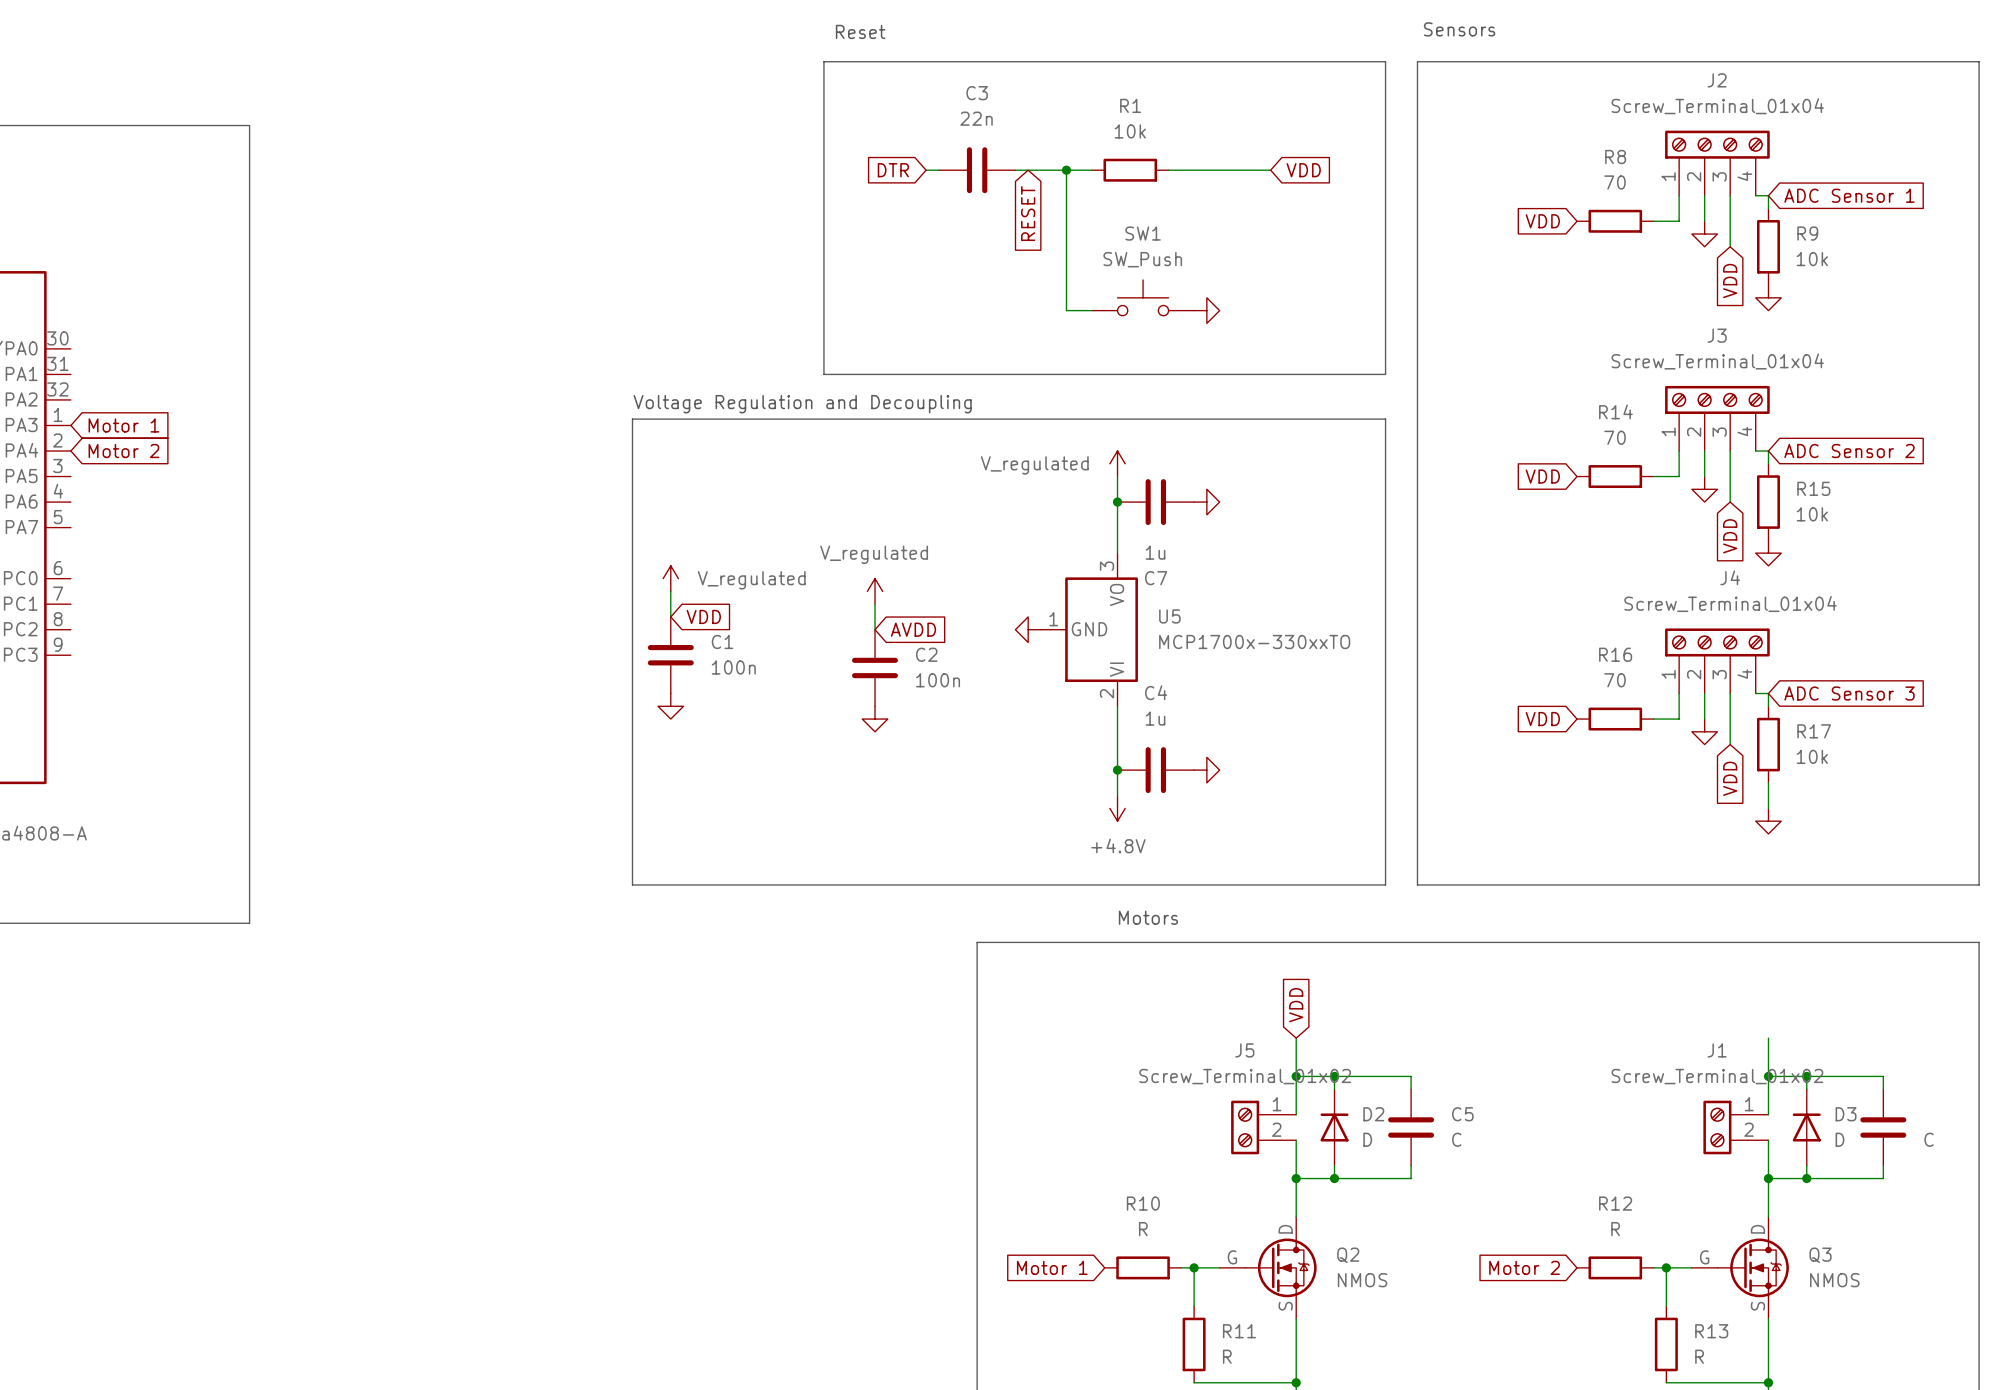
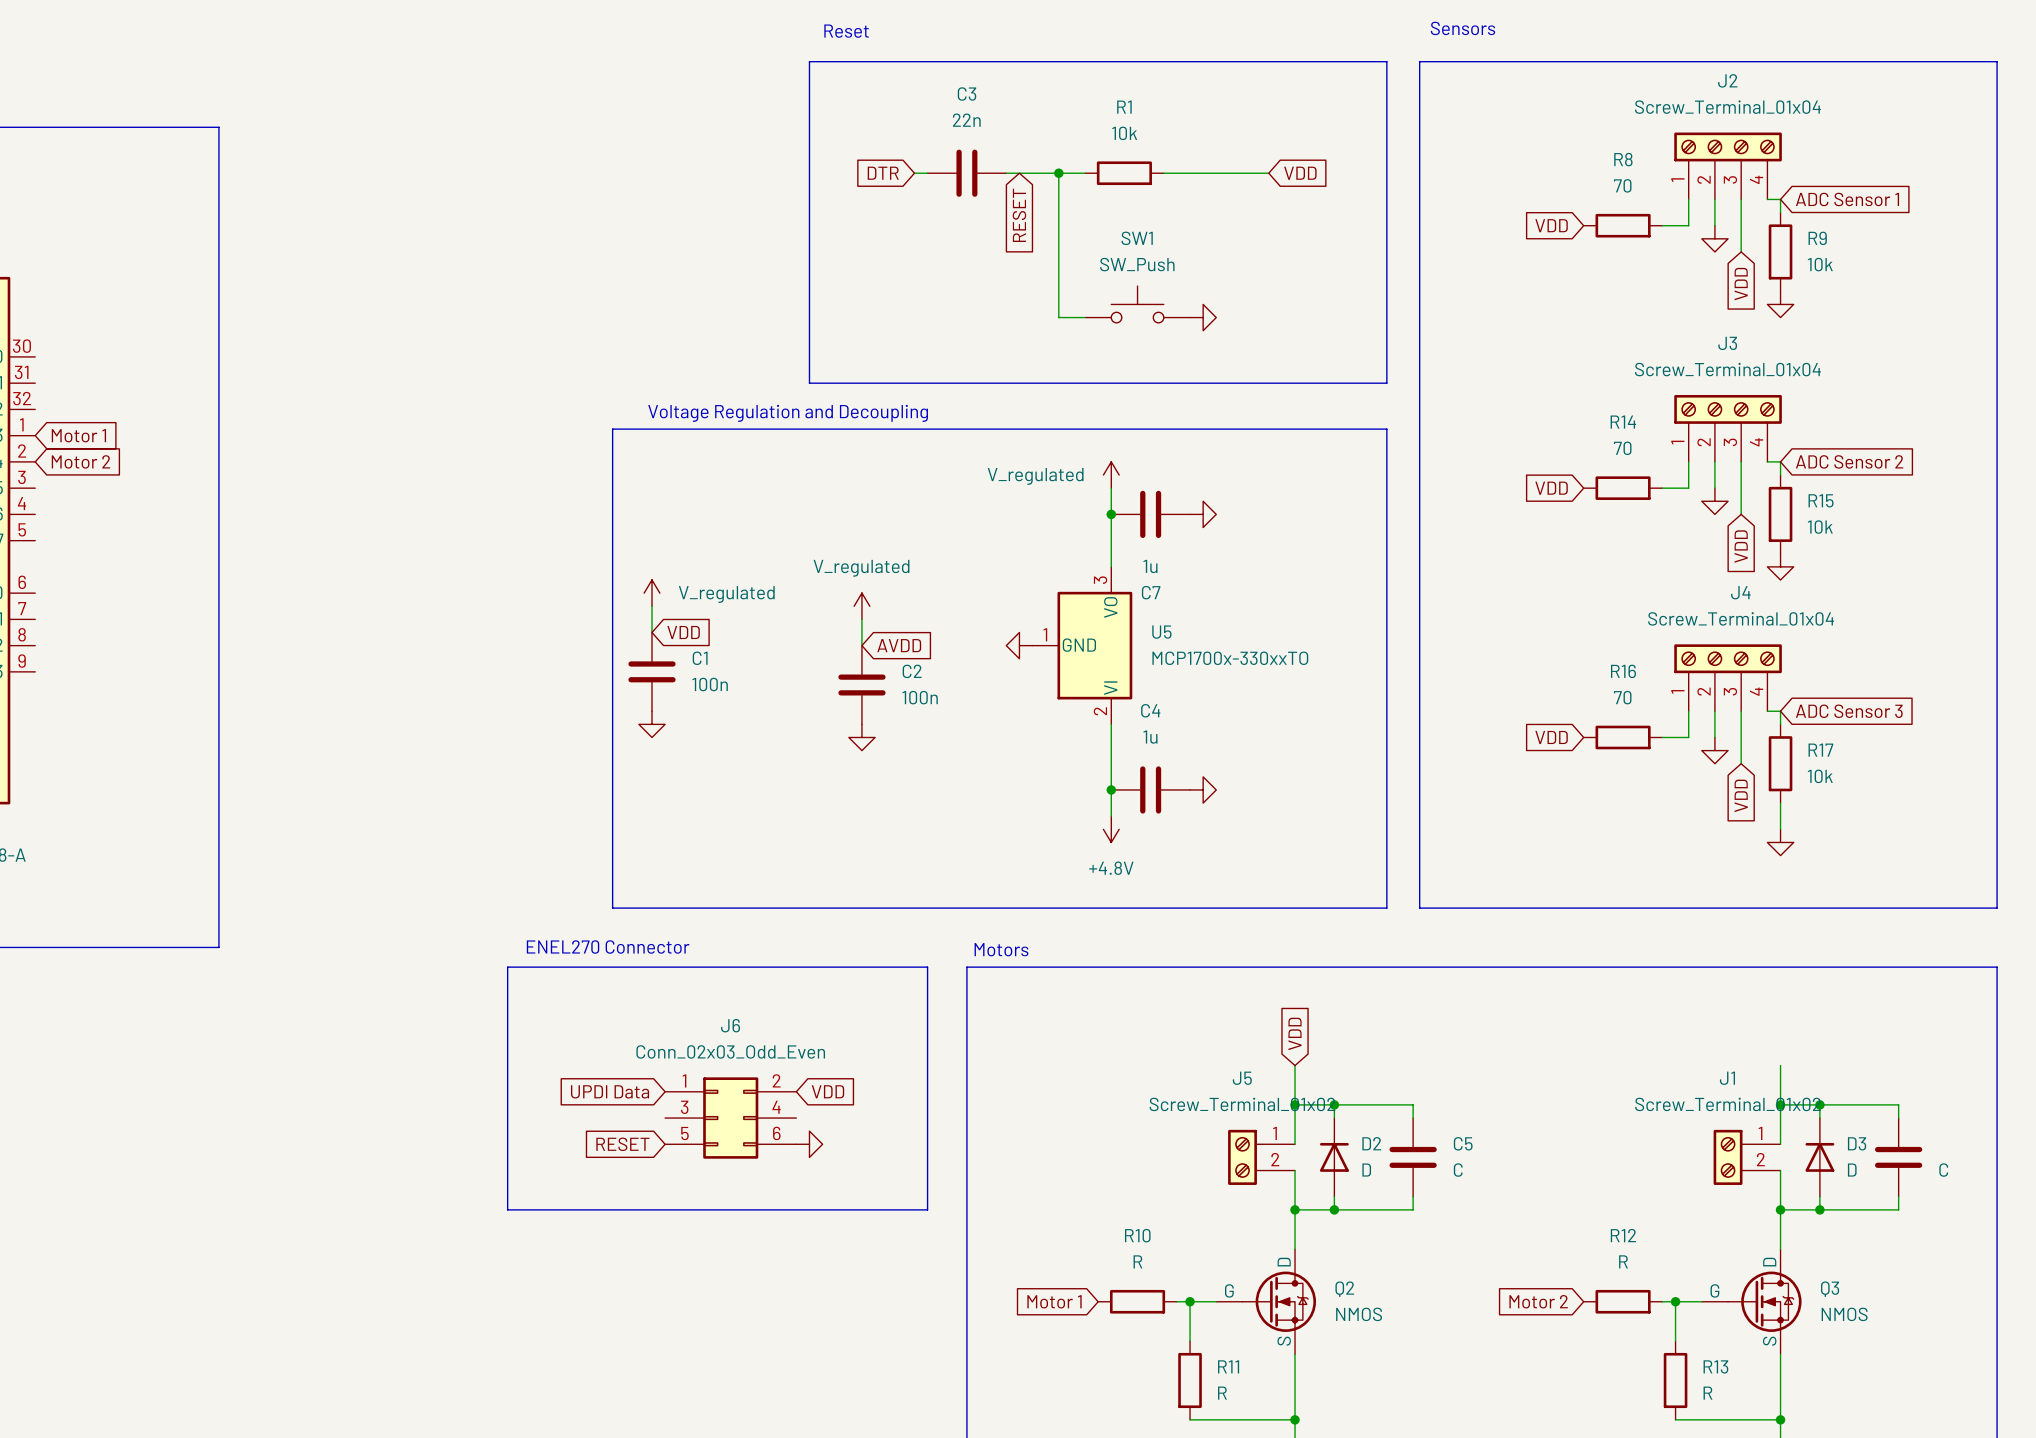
text position: Motors (1148, 917) -> Motors (1001, 949)
text: none -> ENEL270 Connector (608, 947)
line: none -> (507, 967) (927, 967) (927, 1209) (507, 1209) (507, 967)
global label: none -> UPDI Data (610, 1091)
global label: none -> VDD (827, 1091)
J6: none -> Conn_02x03_Odd_Even (730, 1118)
global label: none -> RESET (622, 1144)
power symbol: none -> (809, 1144)

